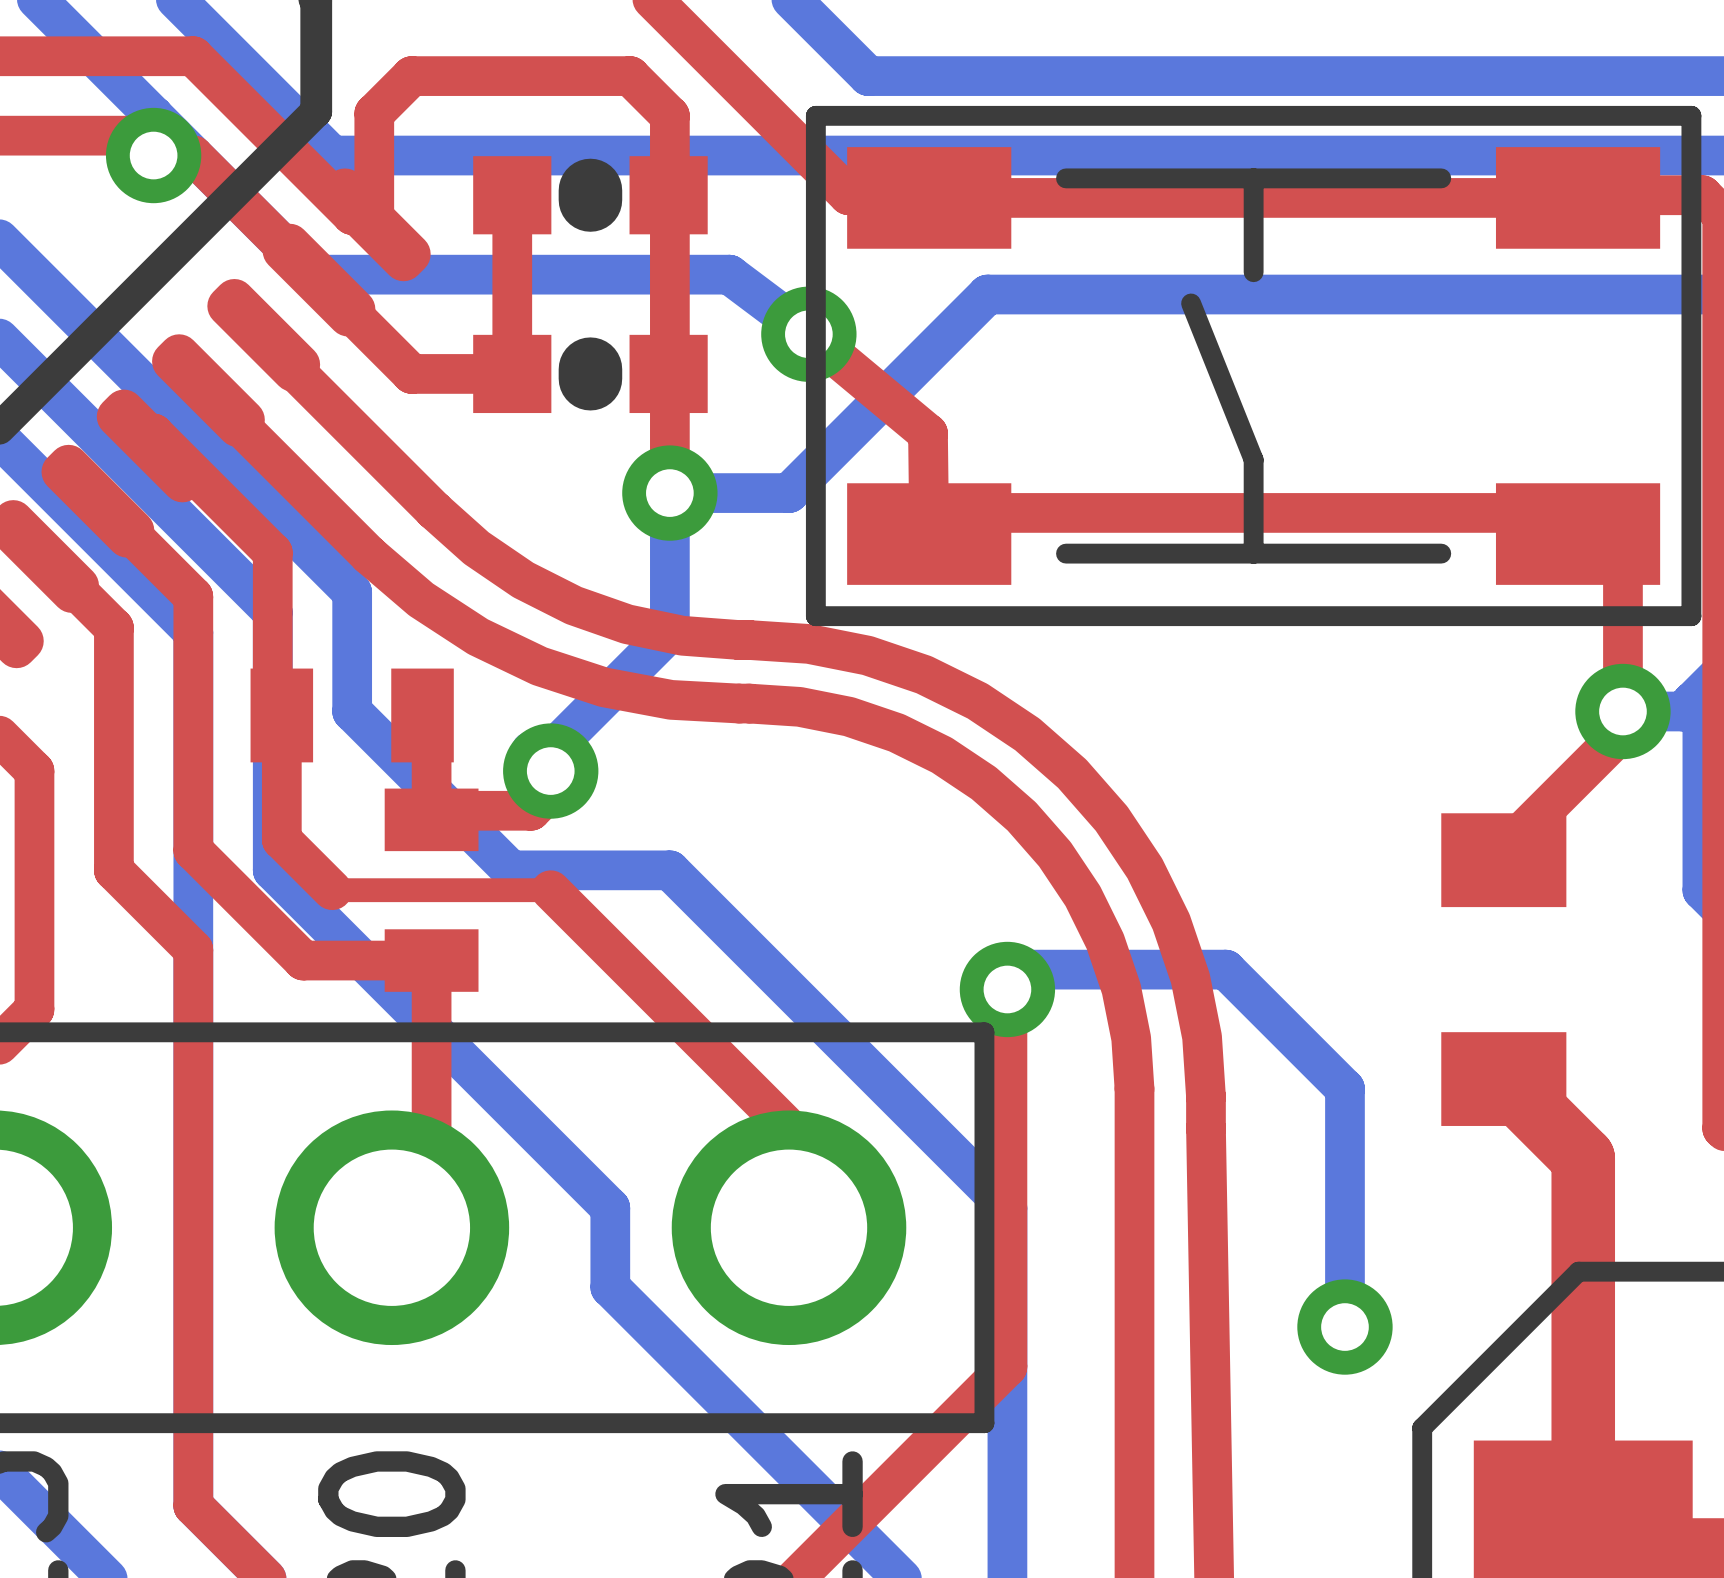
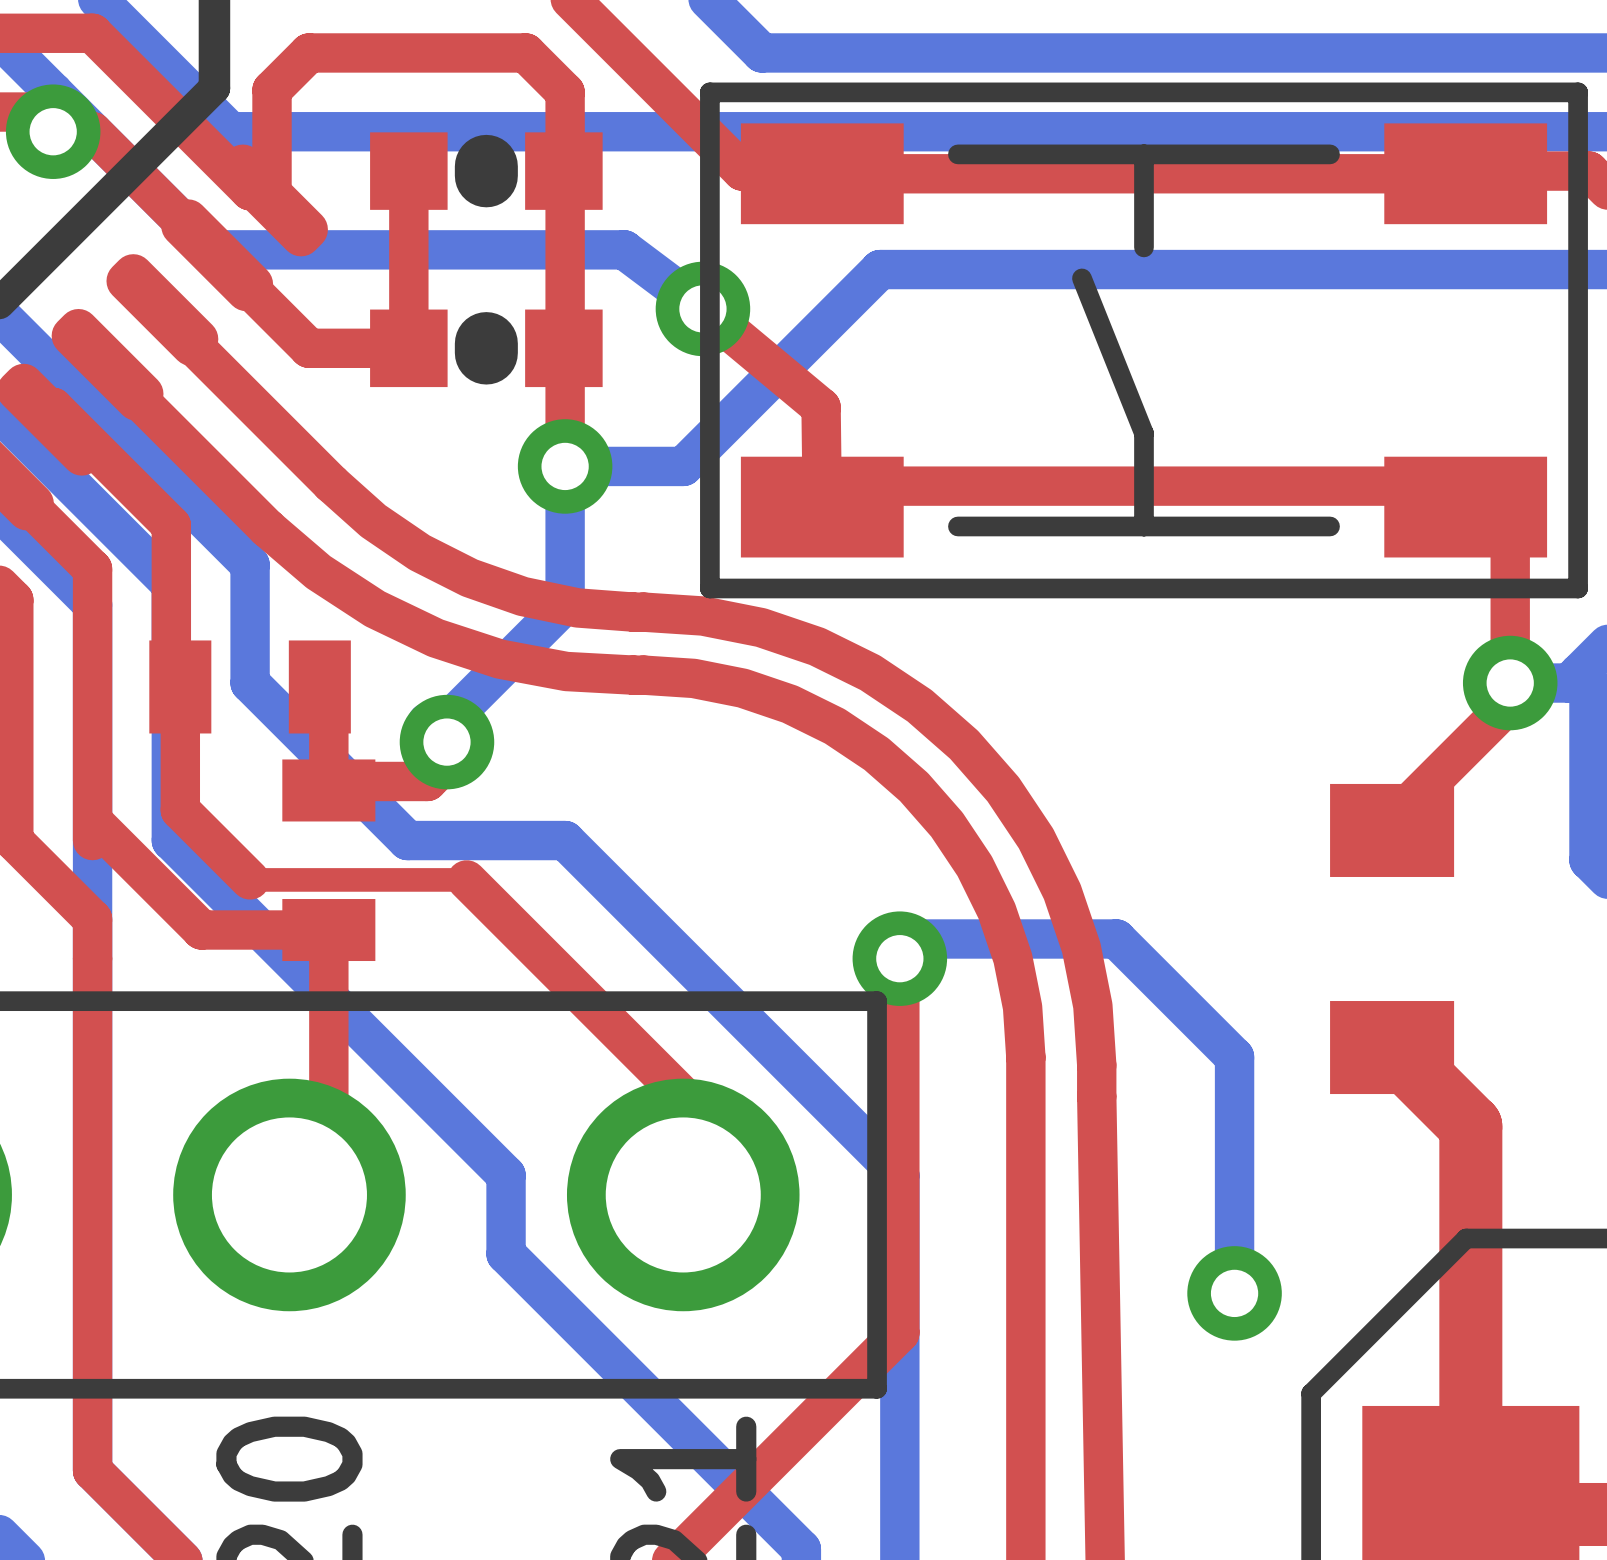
top track: (332, 890) (550, 890) (570, 910) -> (230, 860) (250, 879) (466, 879)

